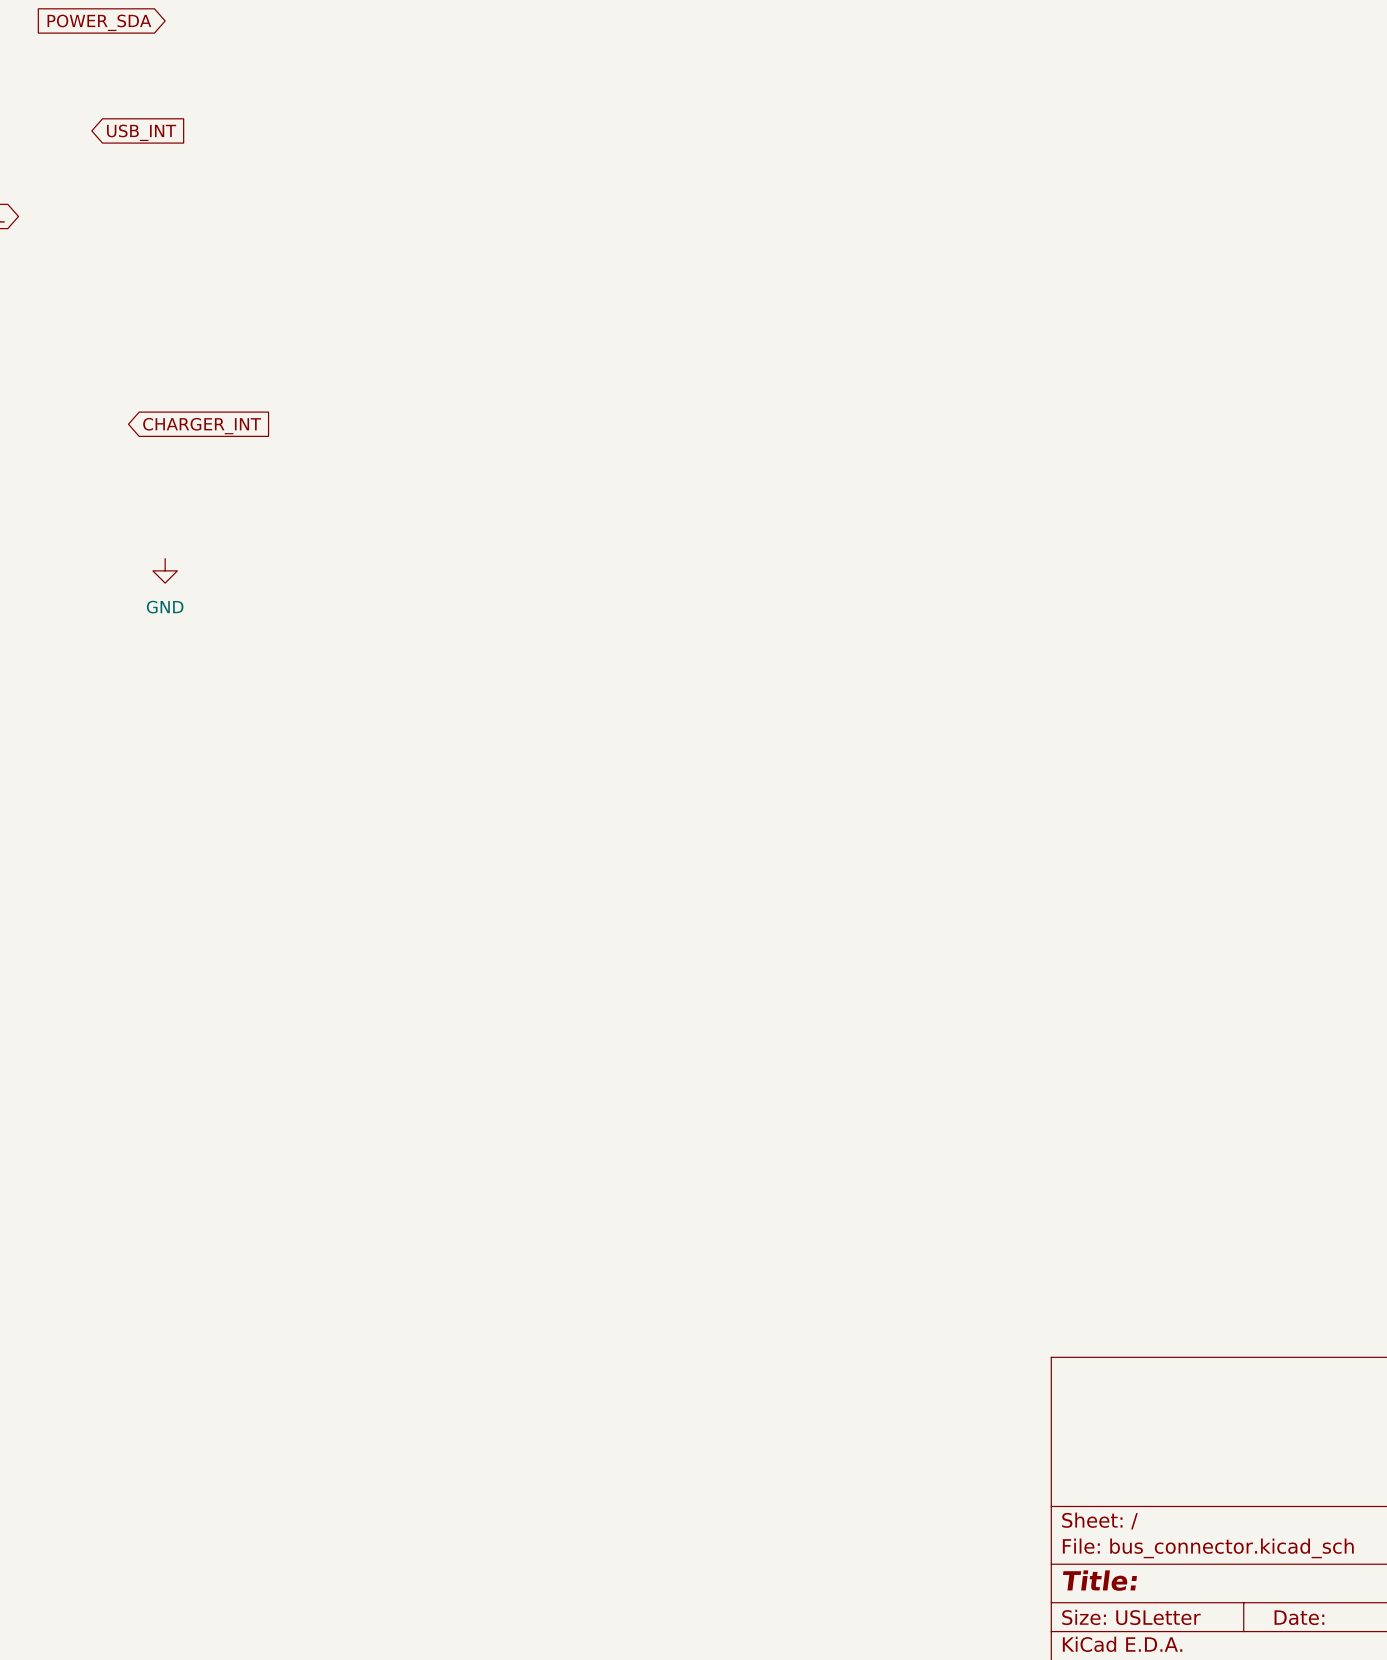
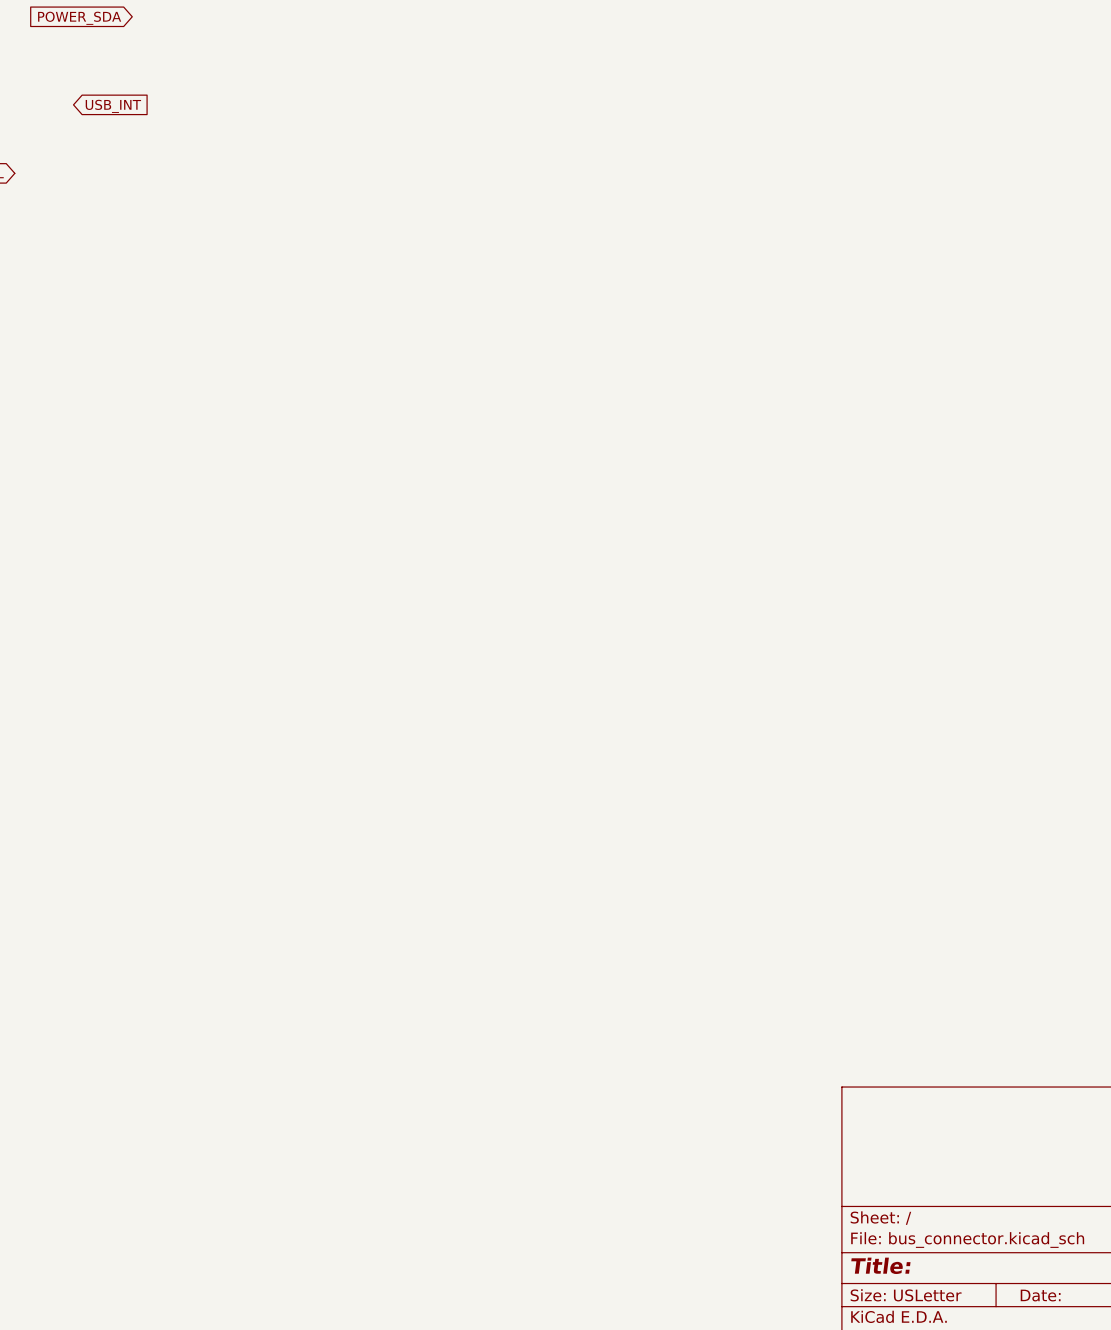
global label: CHARGER_INT (202, 426) -> none
power symbol: GND (165, 570) -> none

